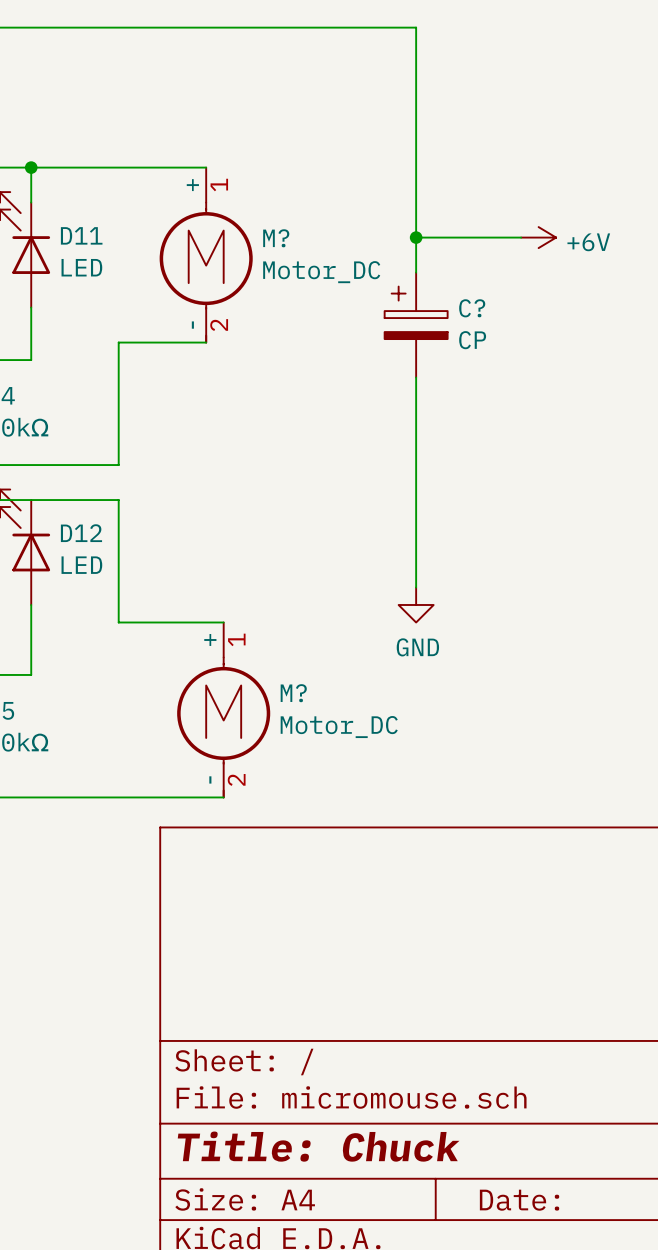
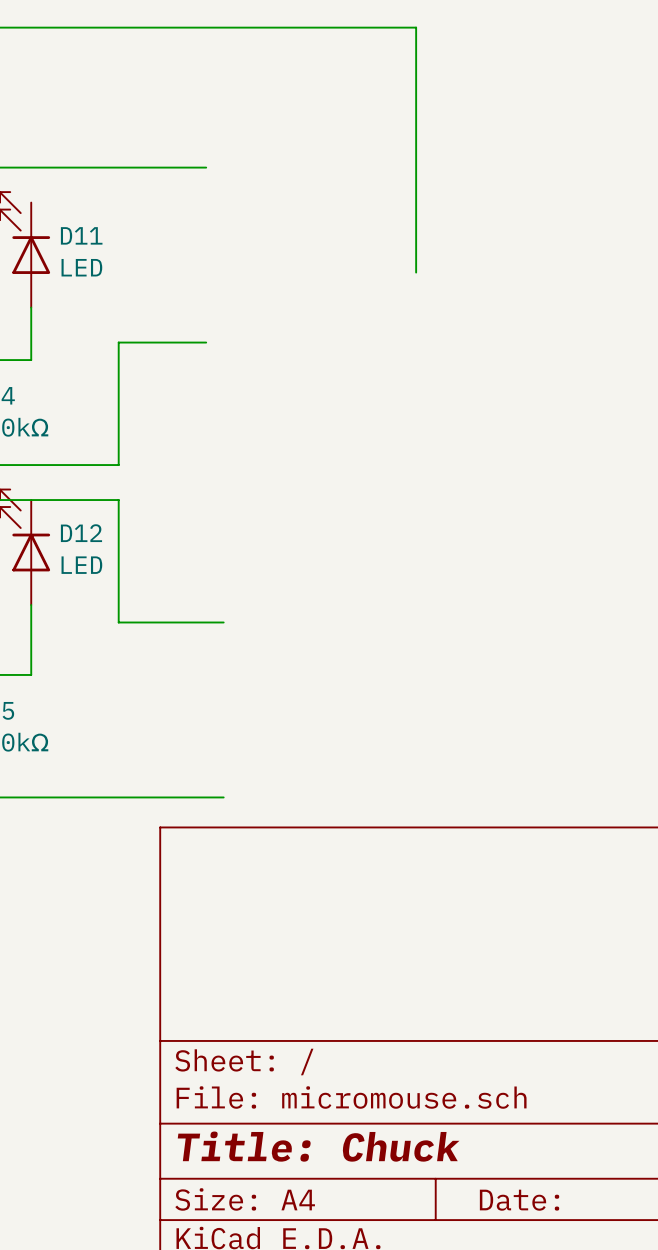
wire: (31, 167) (31, 202) -> none
junction: (31, 167) -> none
wire: (416, 237) (521, 237) -> none
junction: (416, 237) -> none
power symbol: +6V (538, 237) -> none
M?: Motor_DC (206, 255) -> none
C?: CP (416, 325) -> none
wire: (416, 377) (416, 587) -> none
power symbol: GND (416, 604) -> none
M?: Motor_DC (223, 709) -> none

